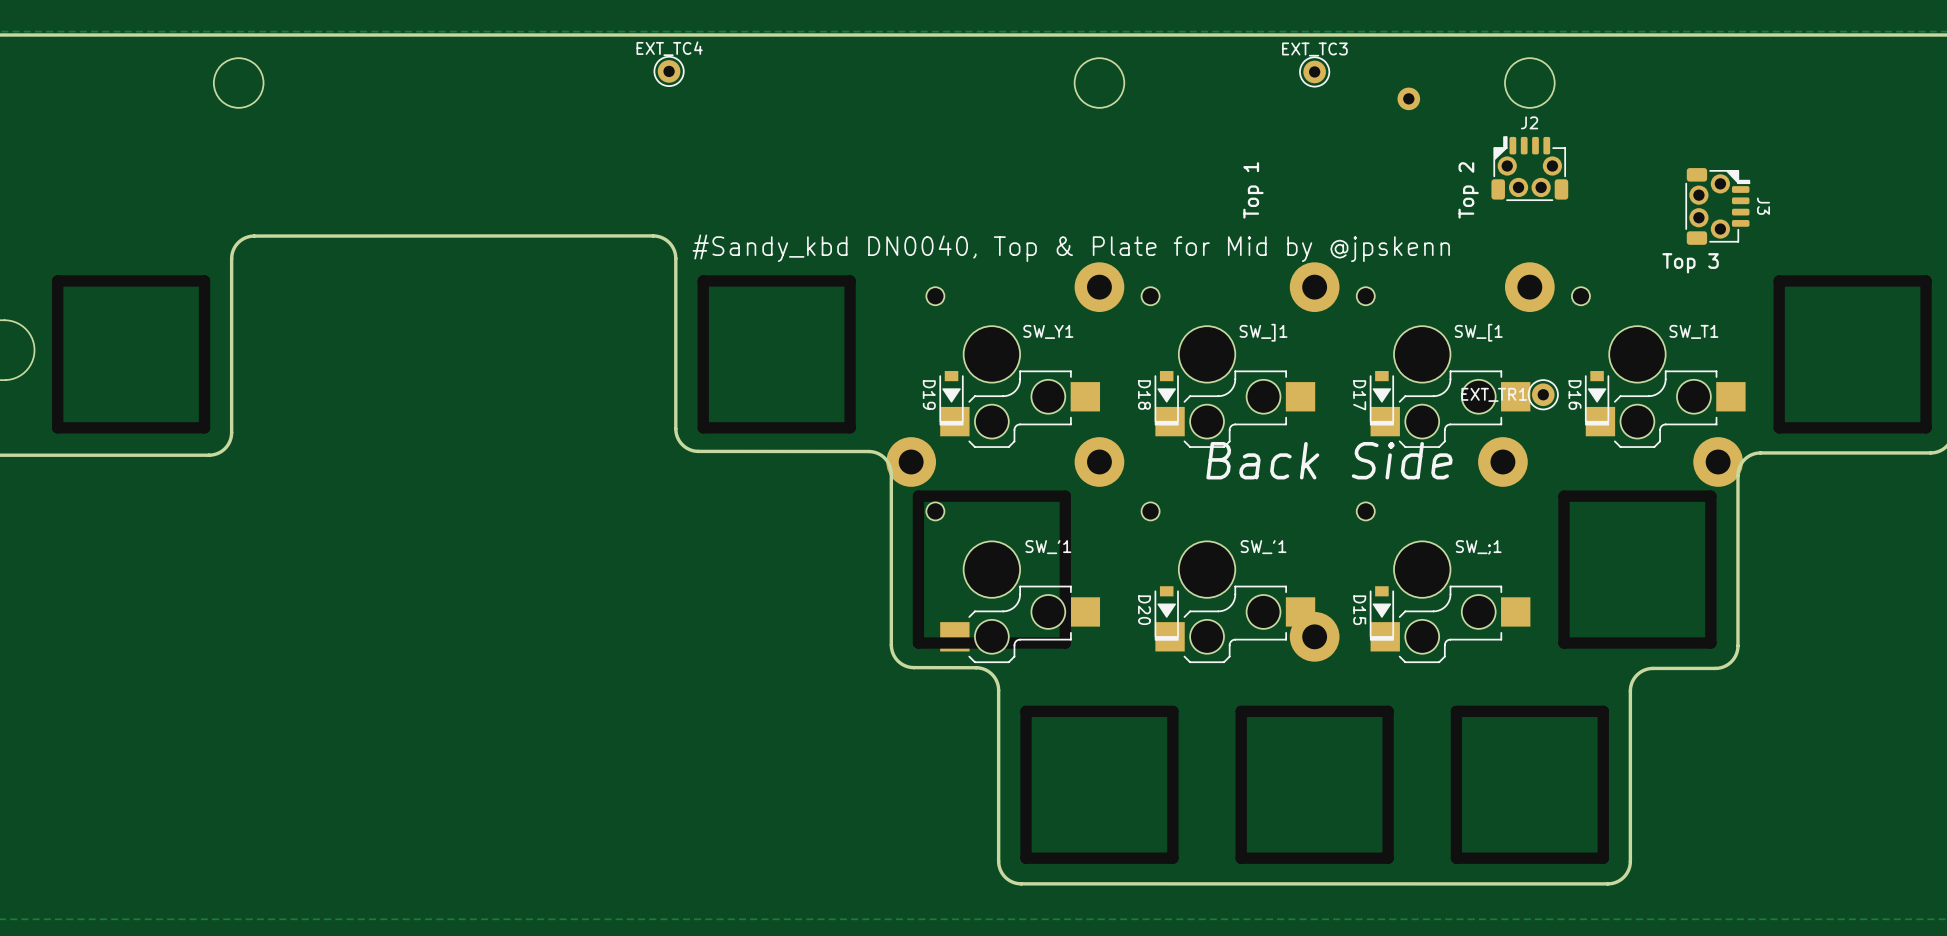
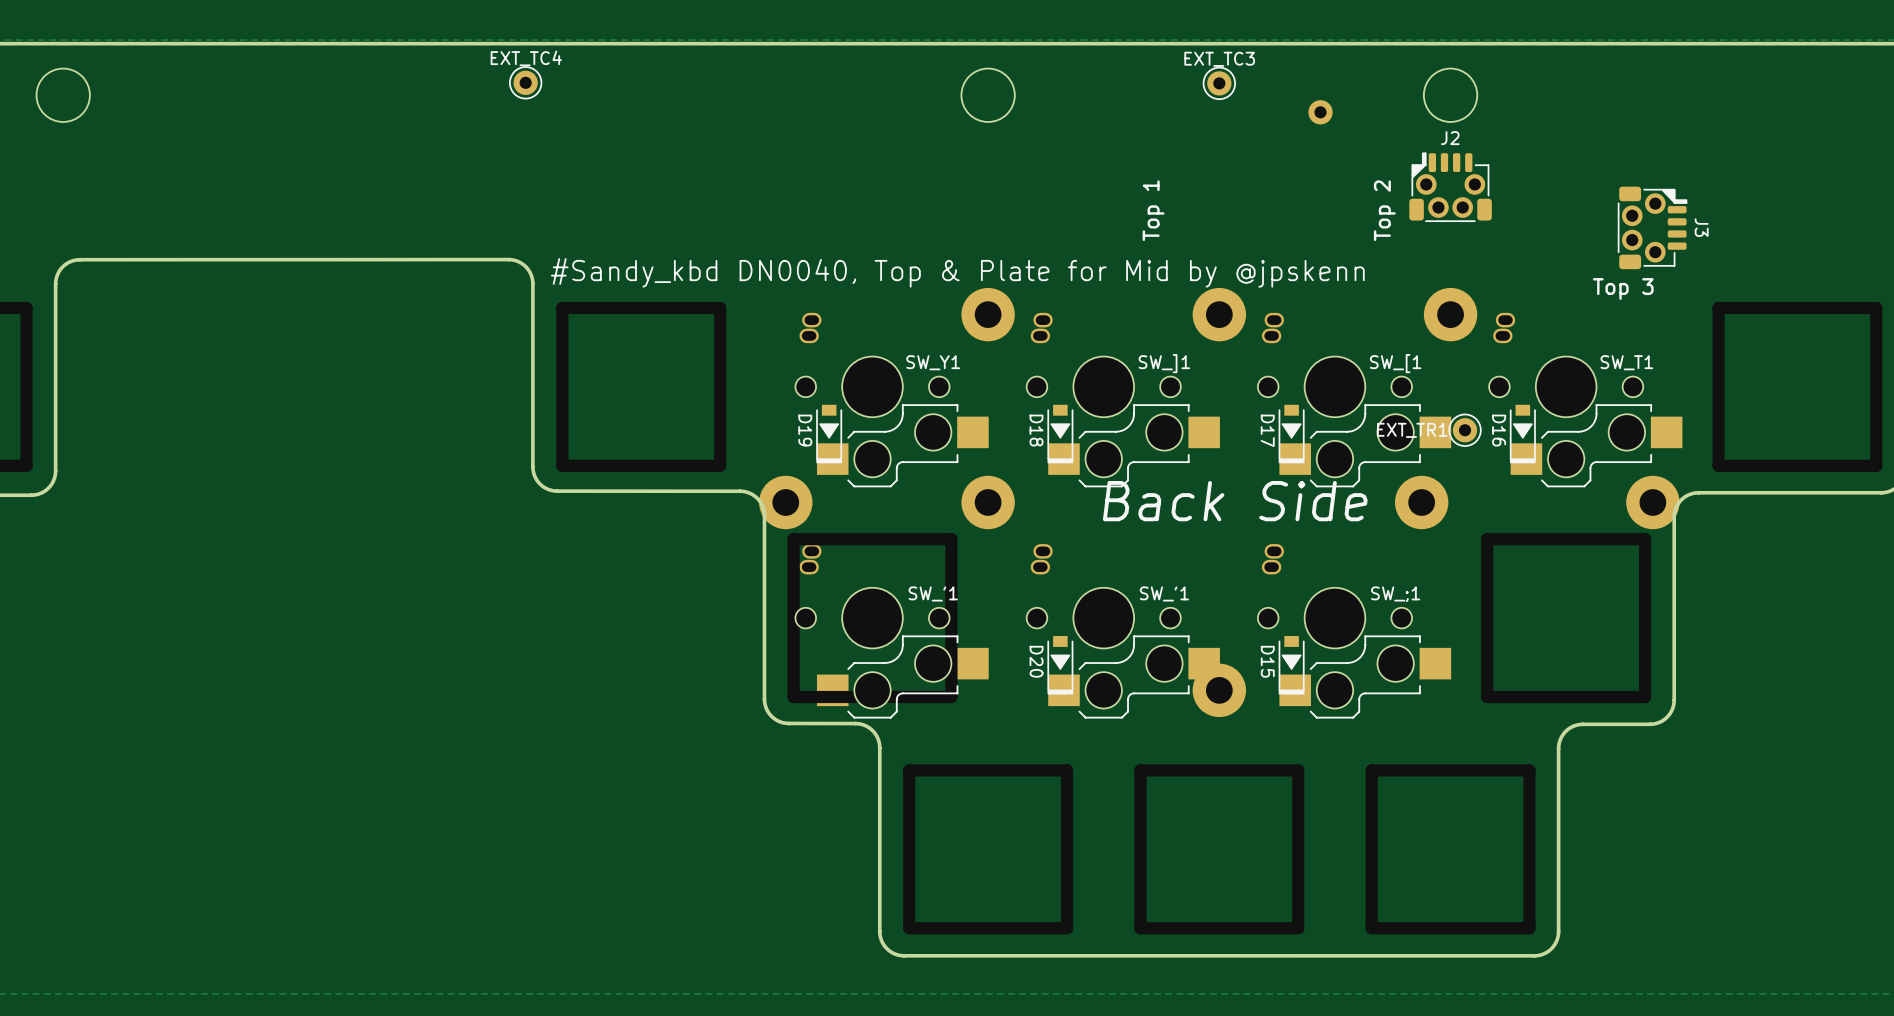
SW_Y1 footprint: [926, 287, 1101, 448] -> [795, 312, 989, 488]
SW_]1 footprint: [1141, 287, 1316, 448] -> [1026, 312, 1220, 488]
SW_[1 footprint: [1356, 287, 1531, 448] -> [1257, 312, 1452, 488]
SW_T1 footprint: [1571, 287, 1746, 448] -> [1489, 312, 1683, 488]
SW_'1 footprint: [926, 502, 1101, 664] -> [795, 544, 989, 719]
SW_'1 footprint: [1141, 502, 1316, 664] -> [1026, 544, 1220, 719]
SW_;1 footprint: [1356, 502, 1531, 664] -> [1257, 544, 1452, 719]

